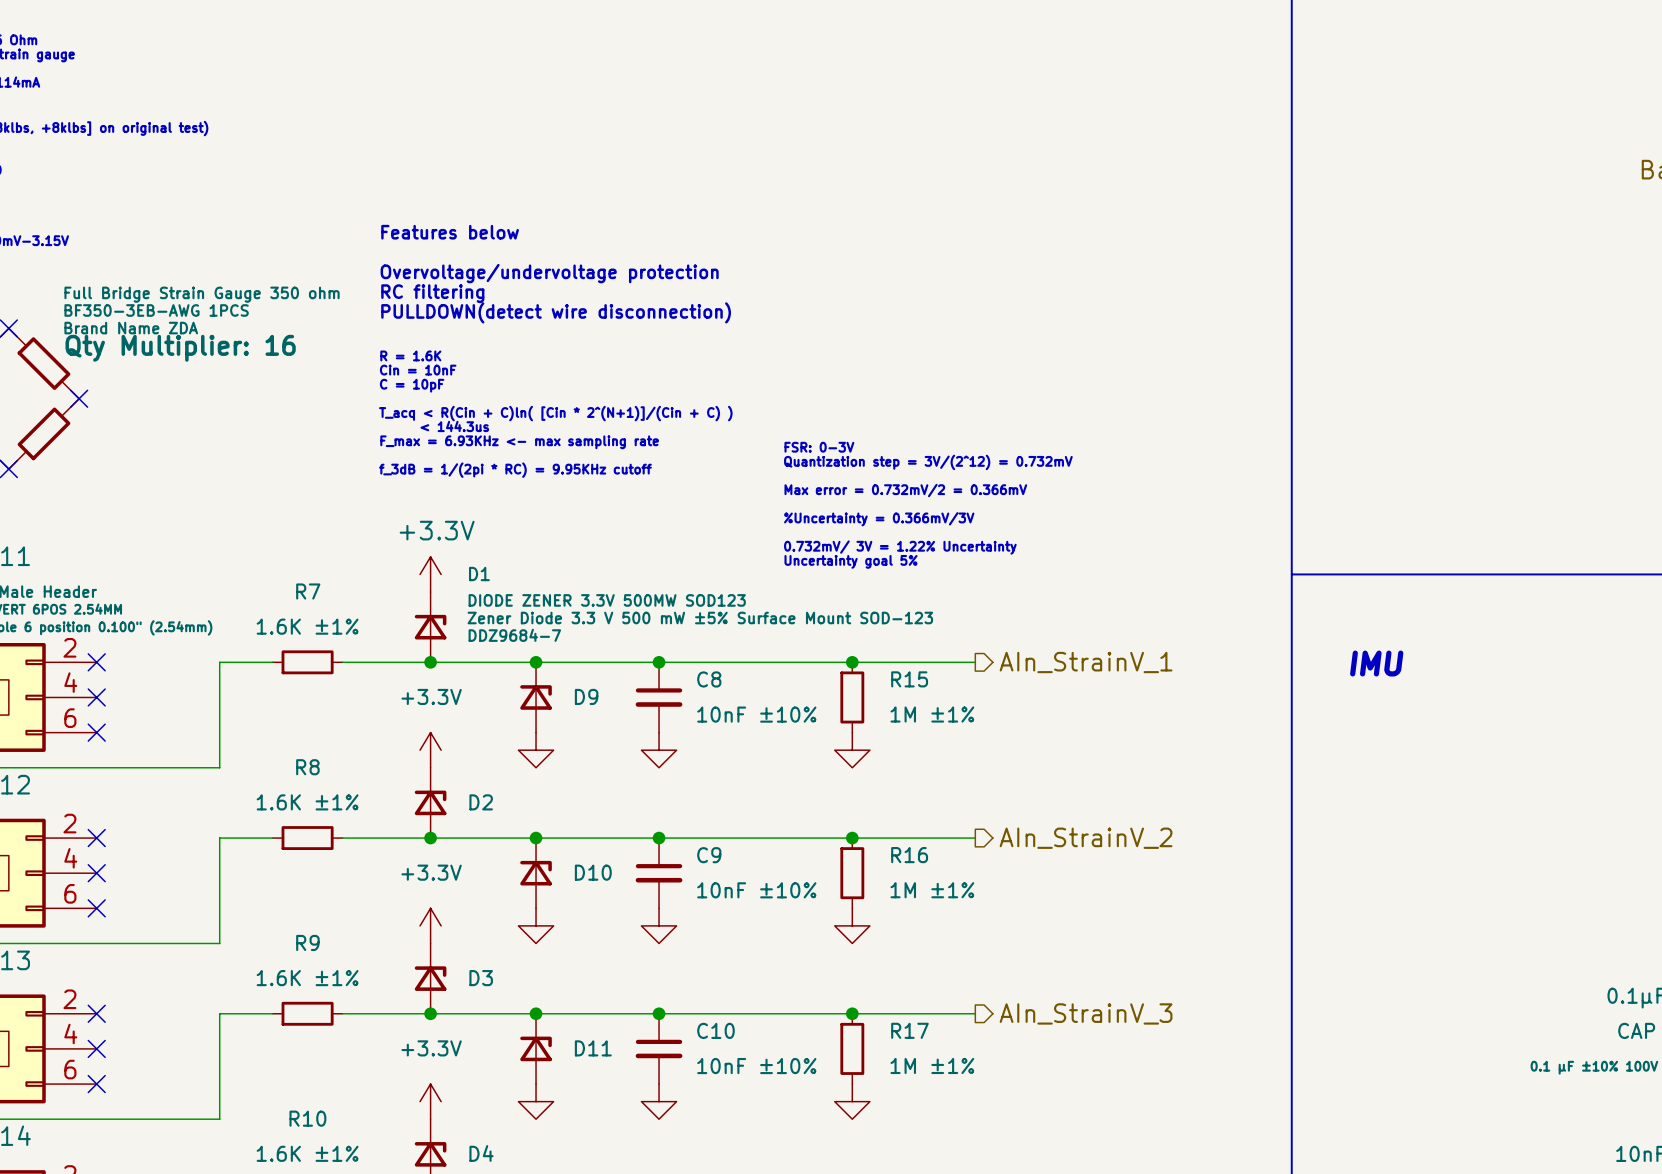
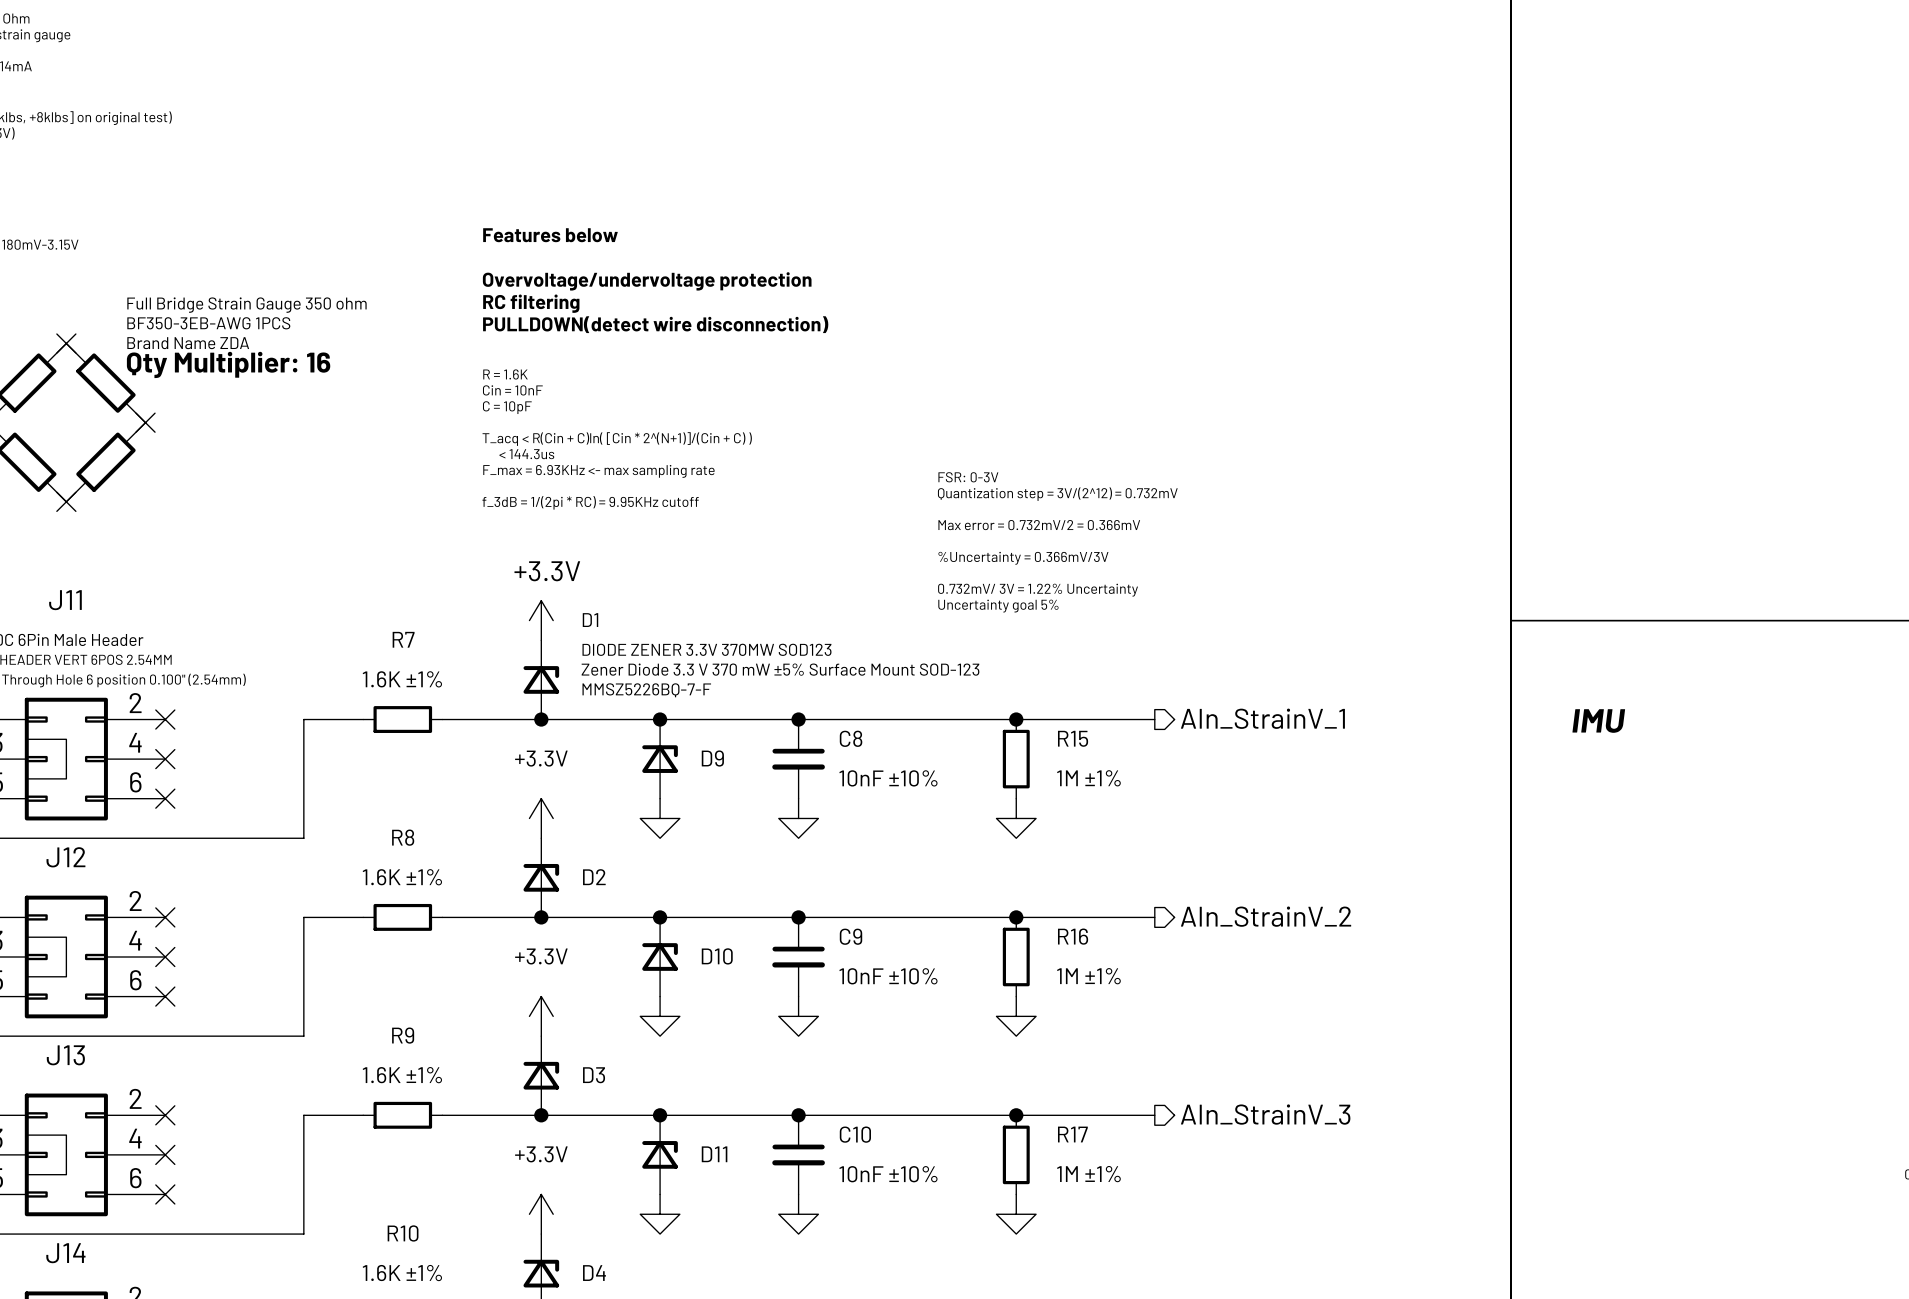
D1 text: DIODE ZENER 3.3V 500MW SOD123 (607, 600) -> DIODE ZENER 3.3V 370MW SOD123 (706, 649)
D1 text: Zener Diode 3.3 V 500 mW ±5% Surface Mount SOD-123 (700, 618) -> Zener Diode 3.3 V 370 mW ±5% Surface Mount SOD-123 (780, 669)
D1 text: DDZ9684-7 (514, 635) -> MMSZ5226BQ-7-F (646, 690)

